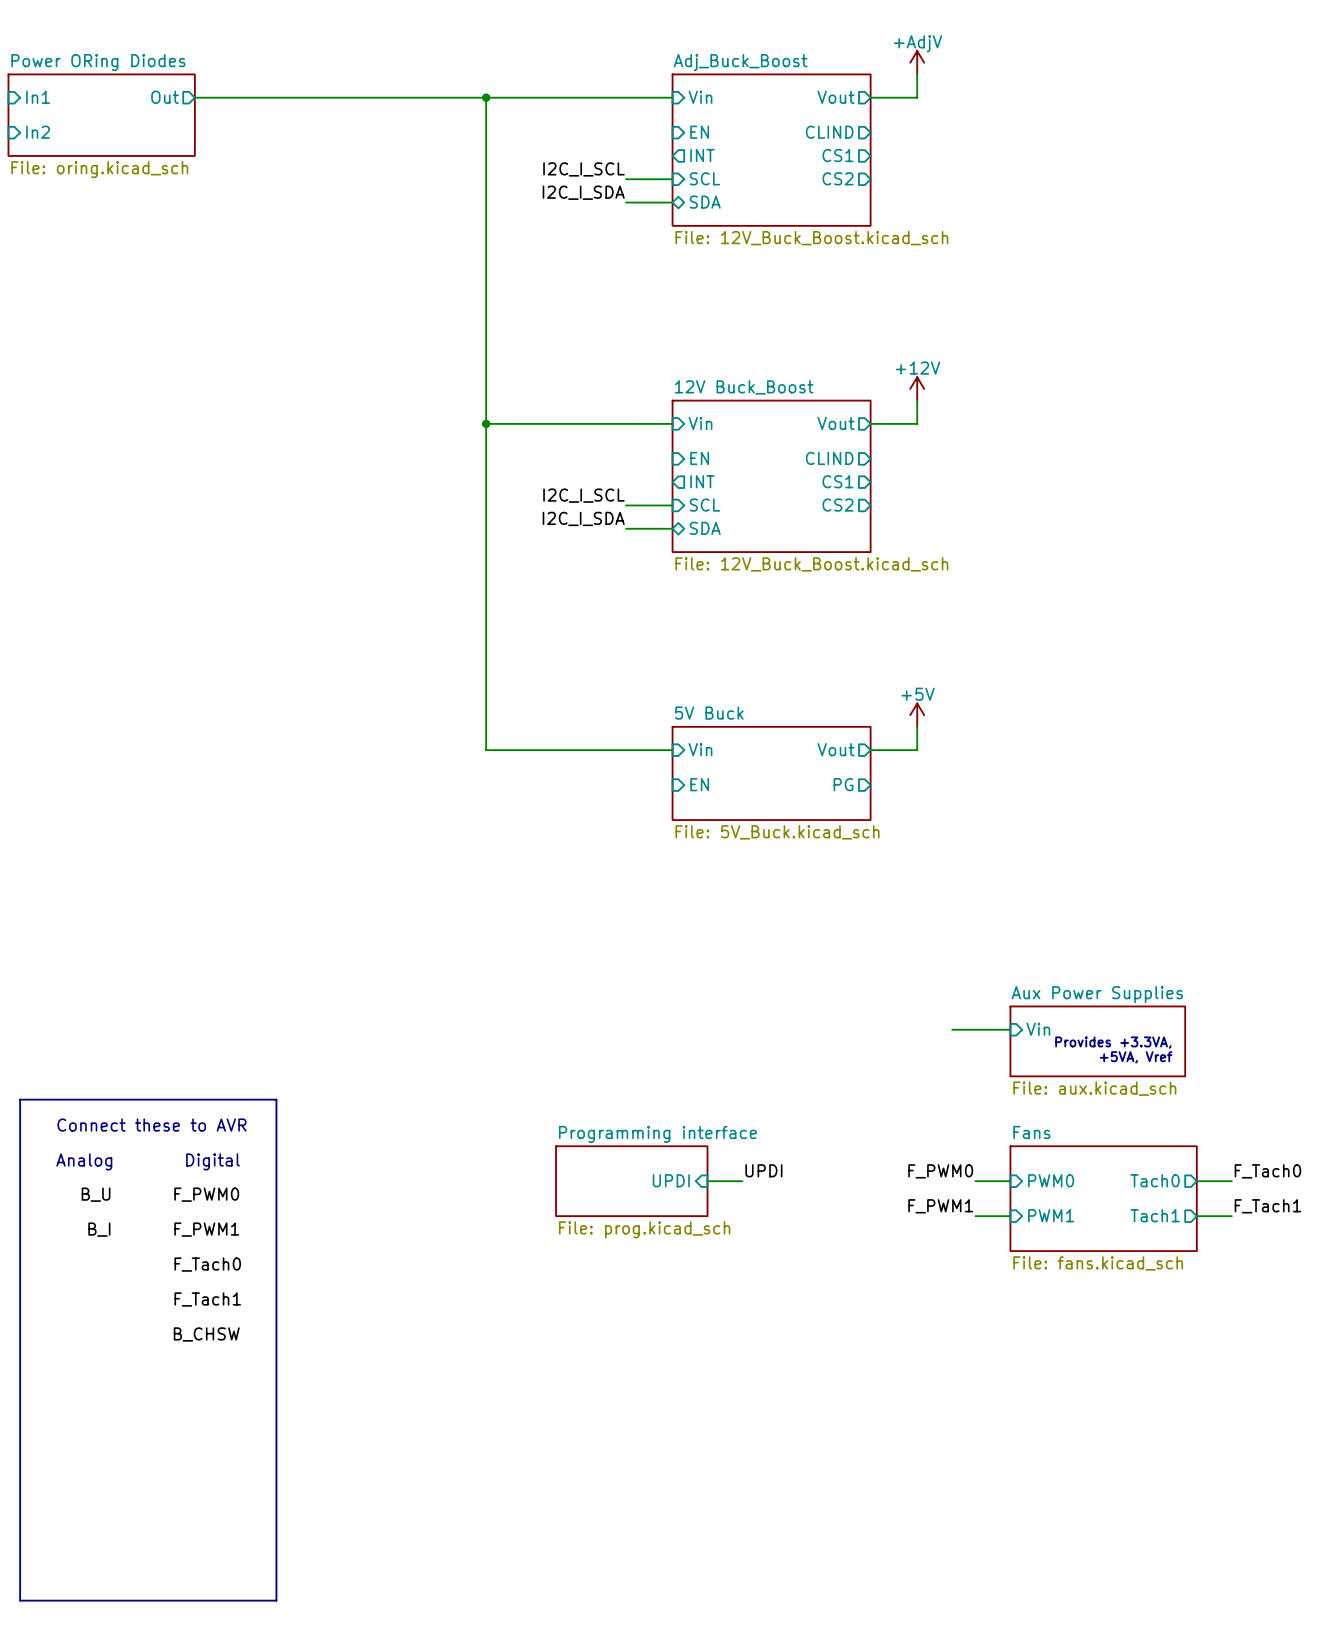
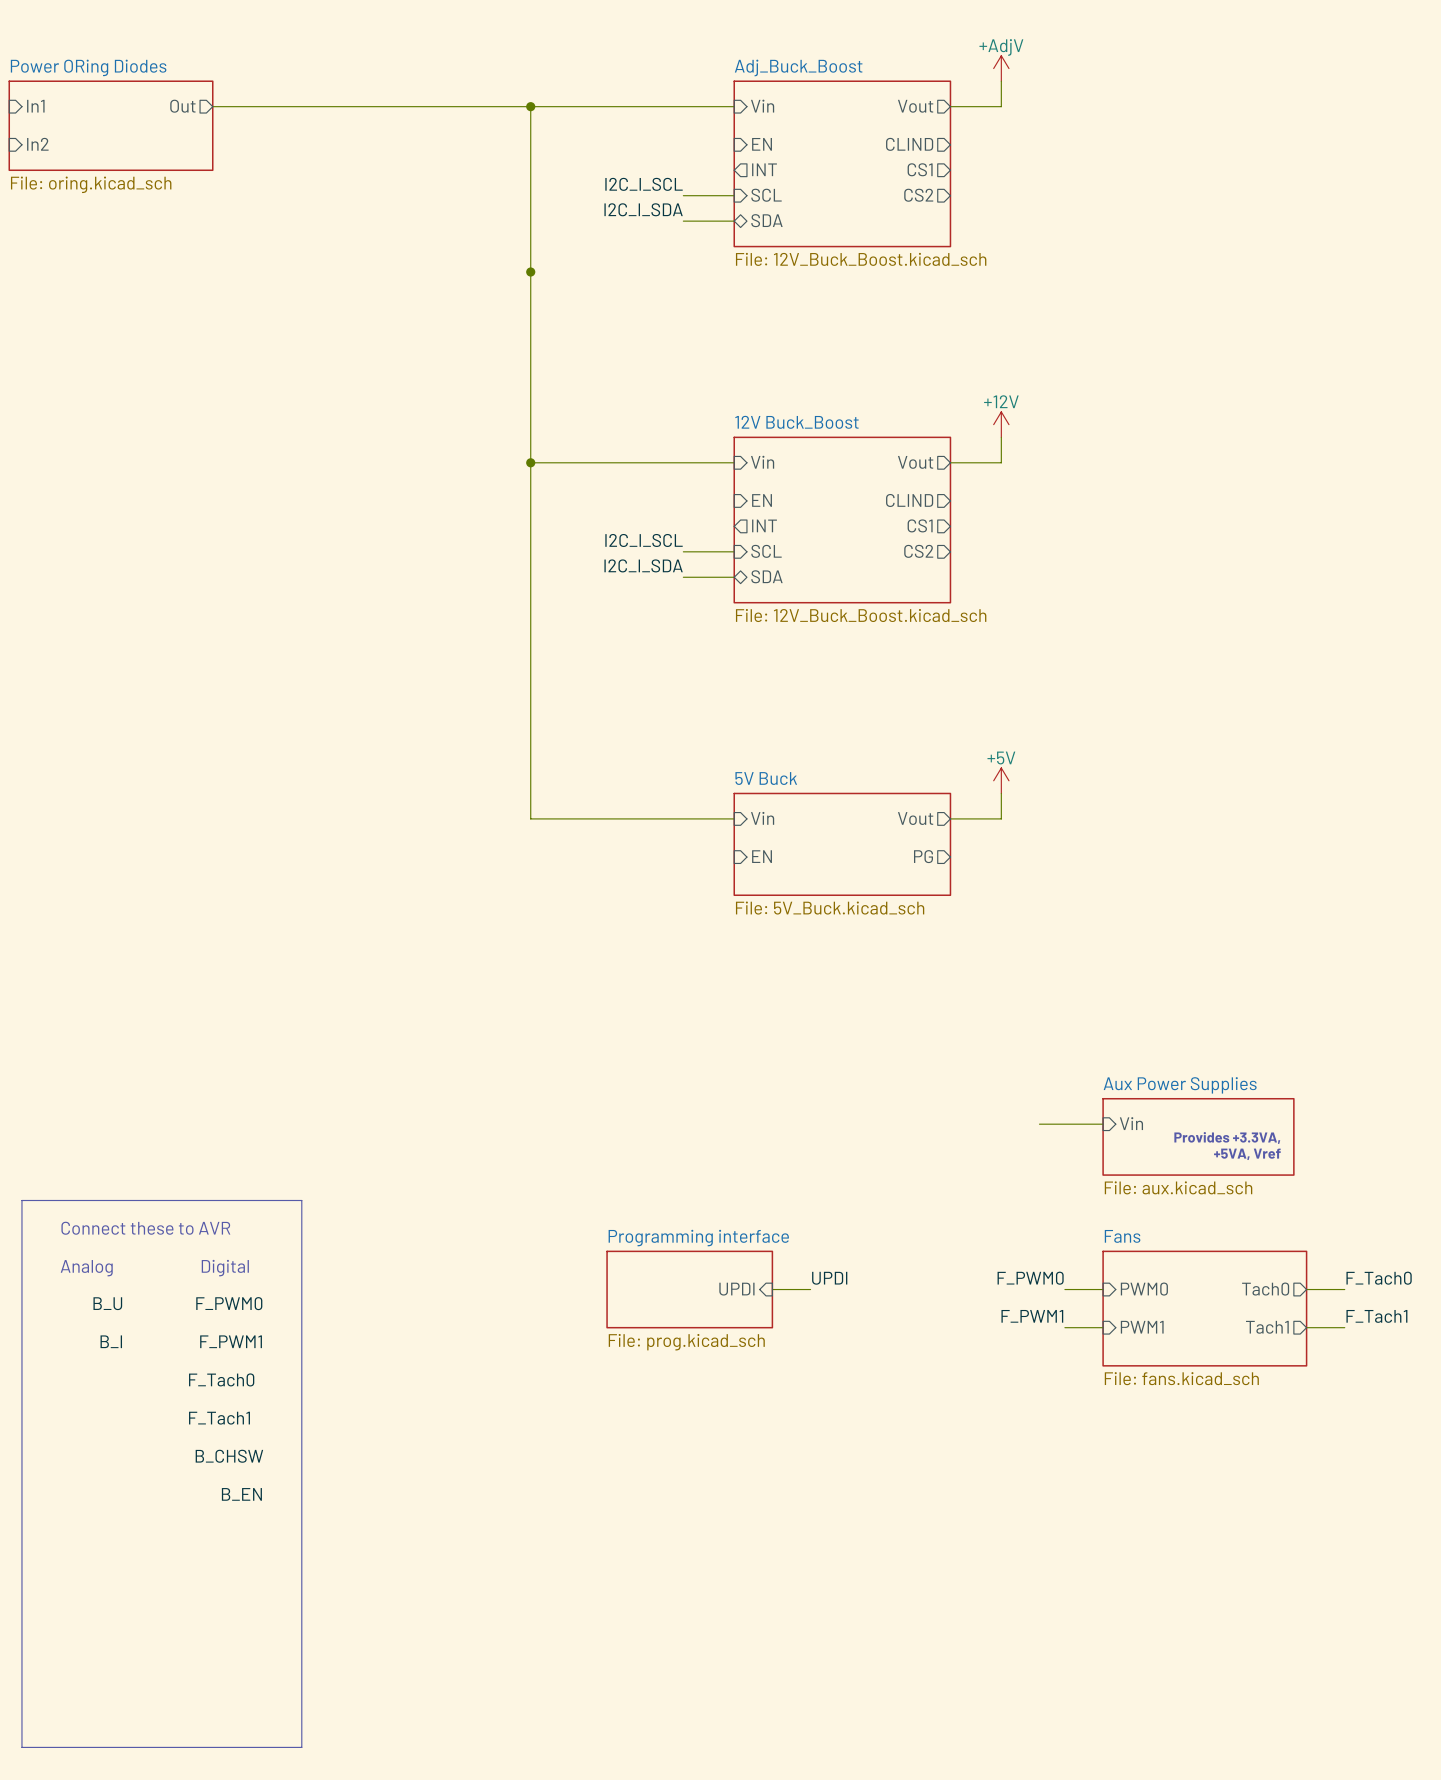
junction: none -> (530, 272)
label: none -> B_EN (241, 1494)

